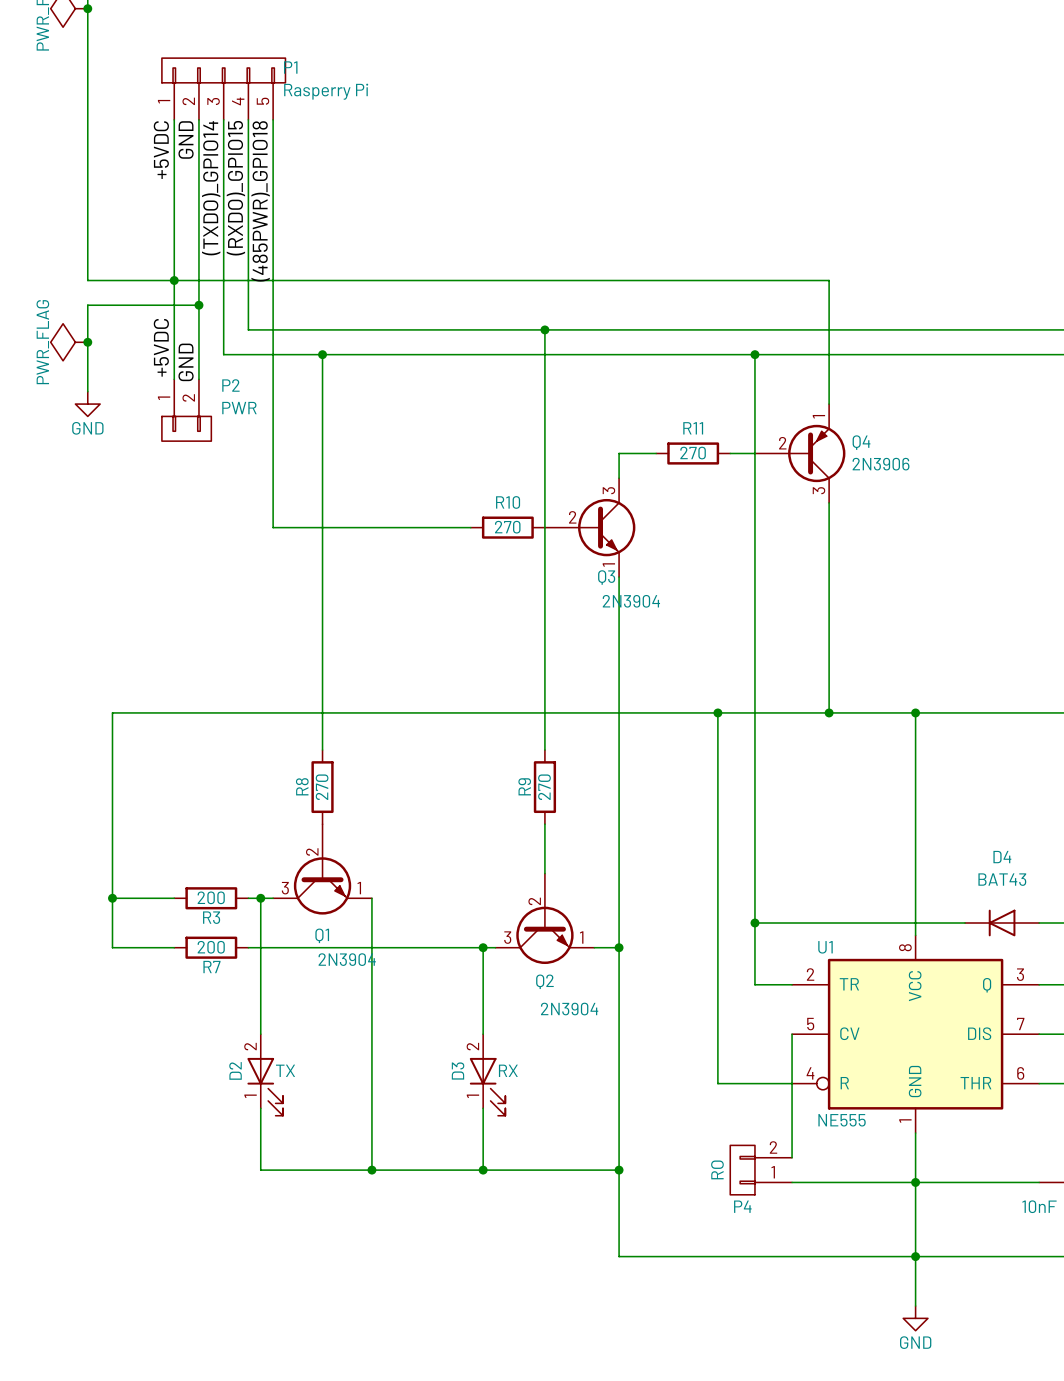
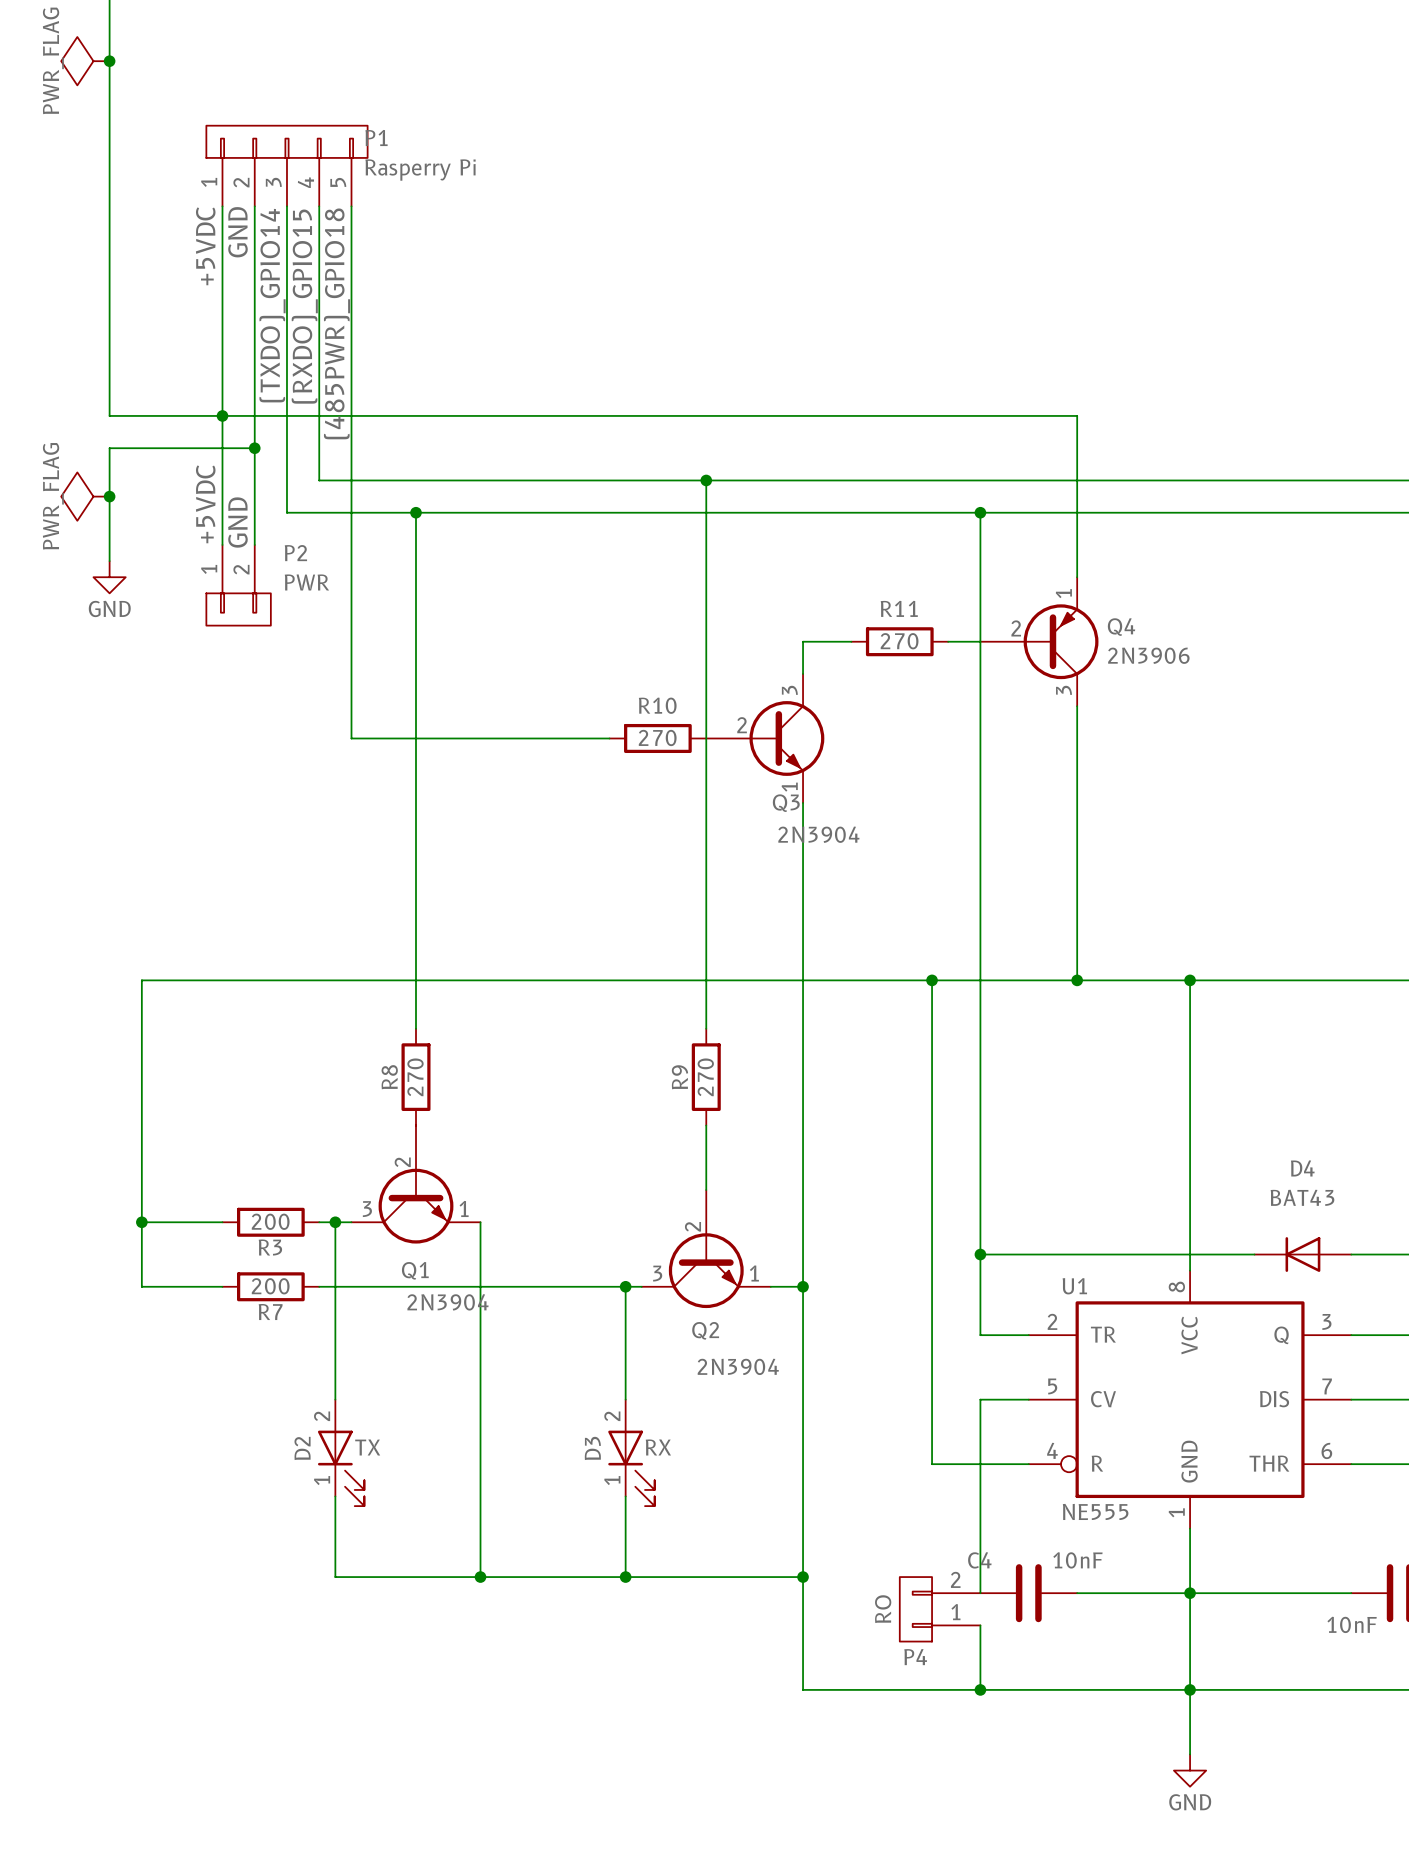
wire: (792, 1034) (792, 1157) -> (1028, 1399) (980, 1399) (980, 1593)
P4 position: (761, 1170) -> (940, 1609)
C4: none -> 10nF (1028, 1593)
wire: none -> (980, 1625) (980, 1689)
junction: none -> (980, 1689)

